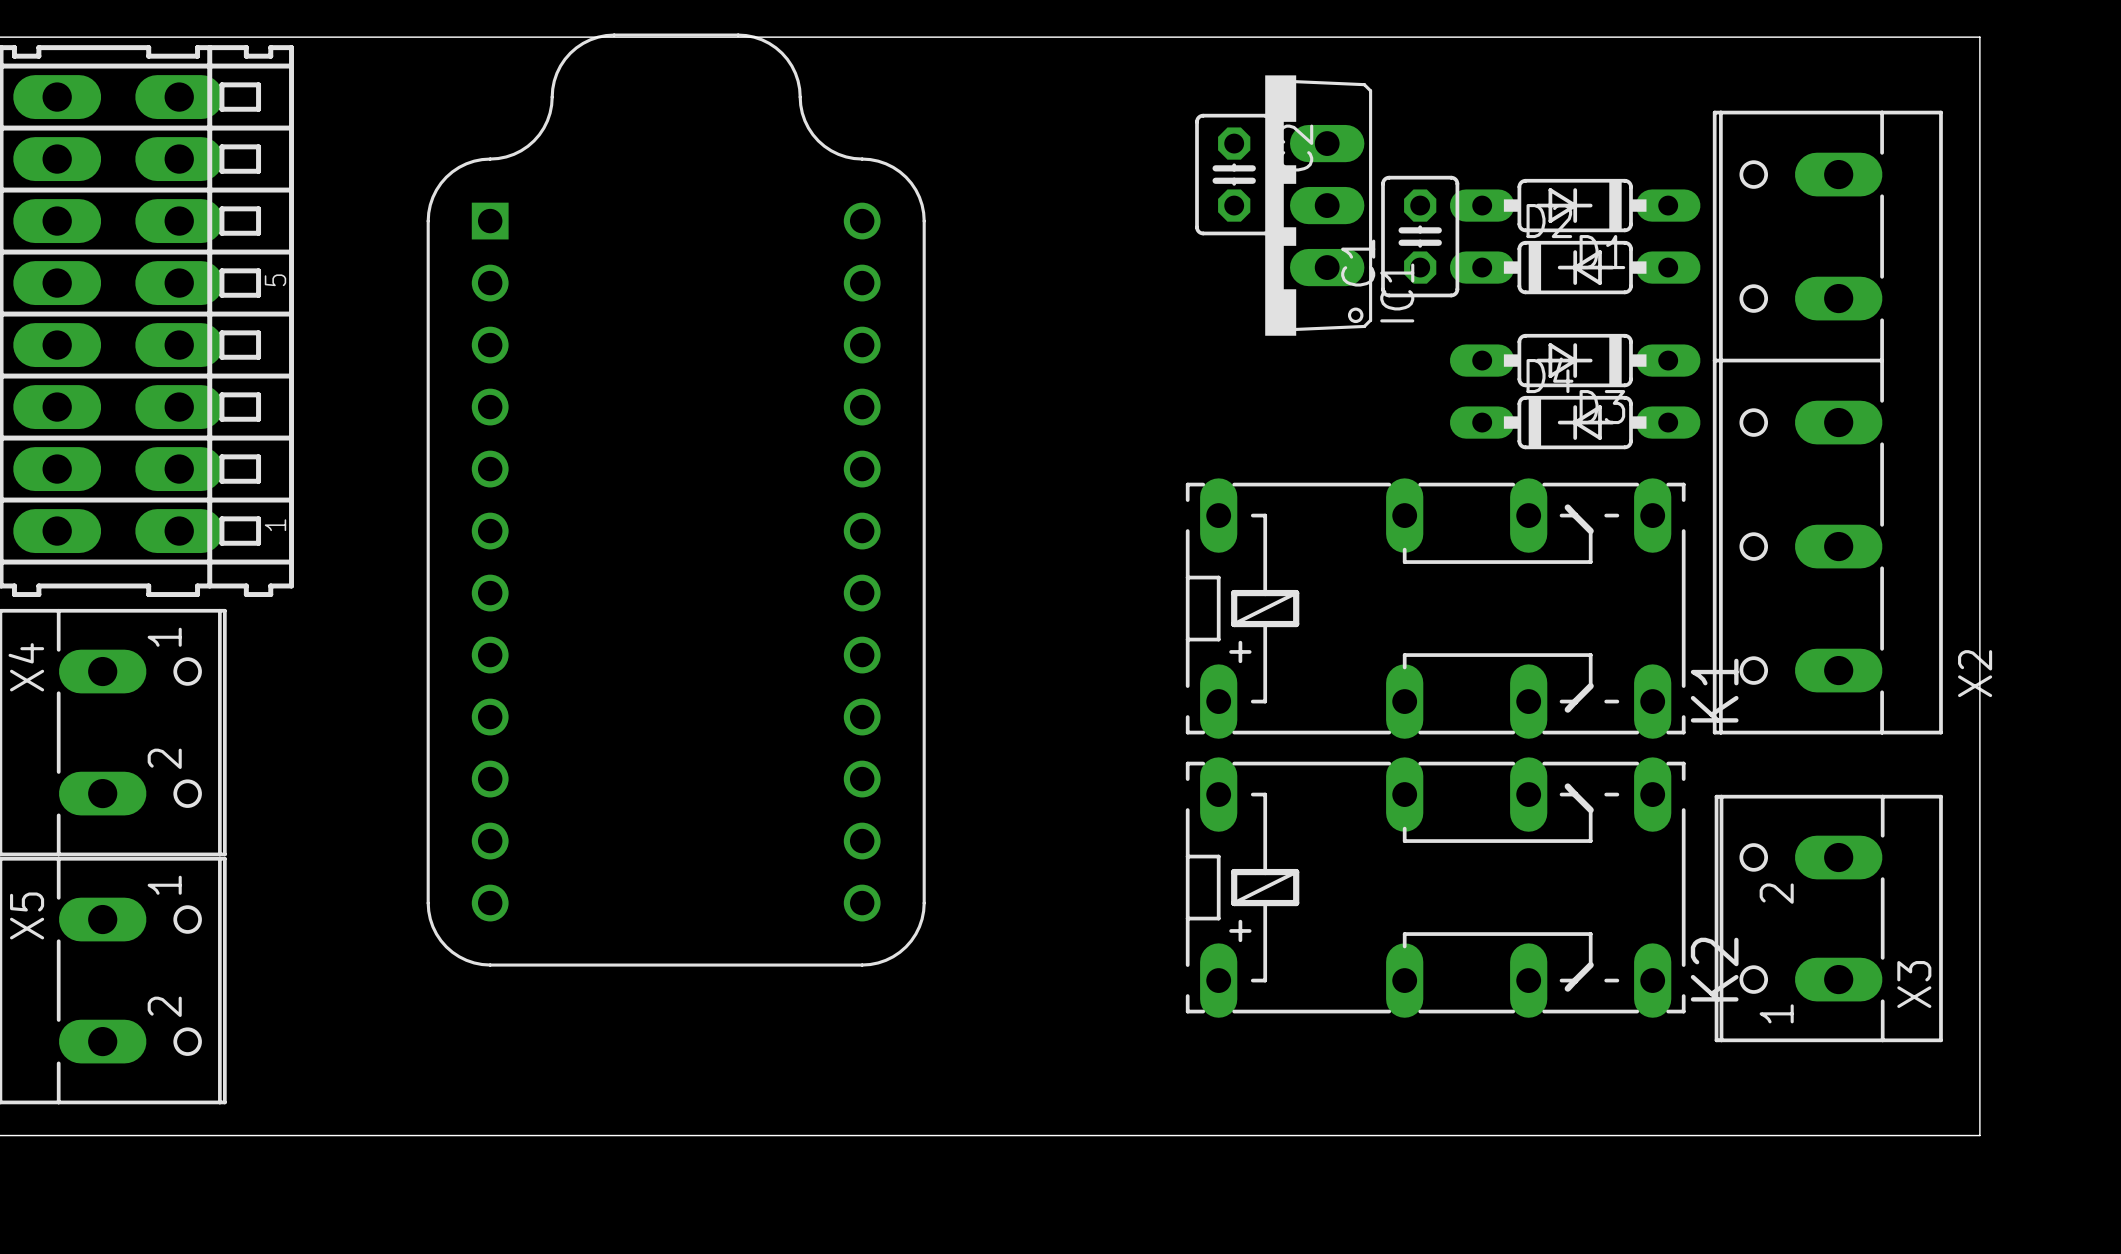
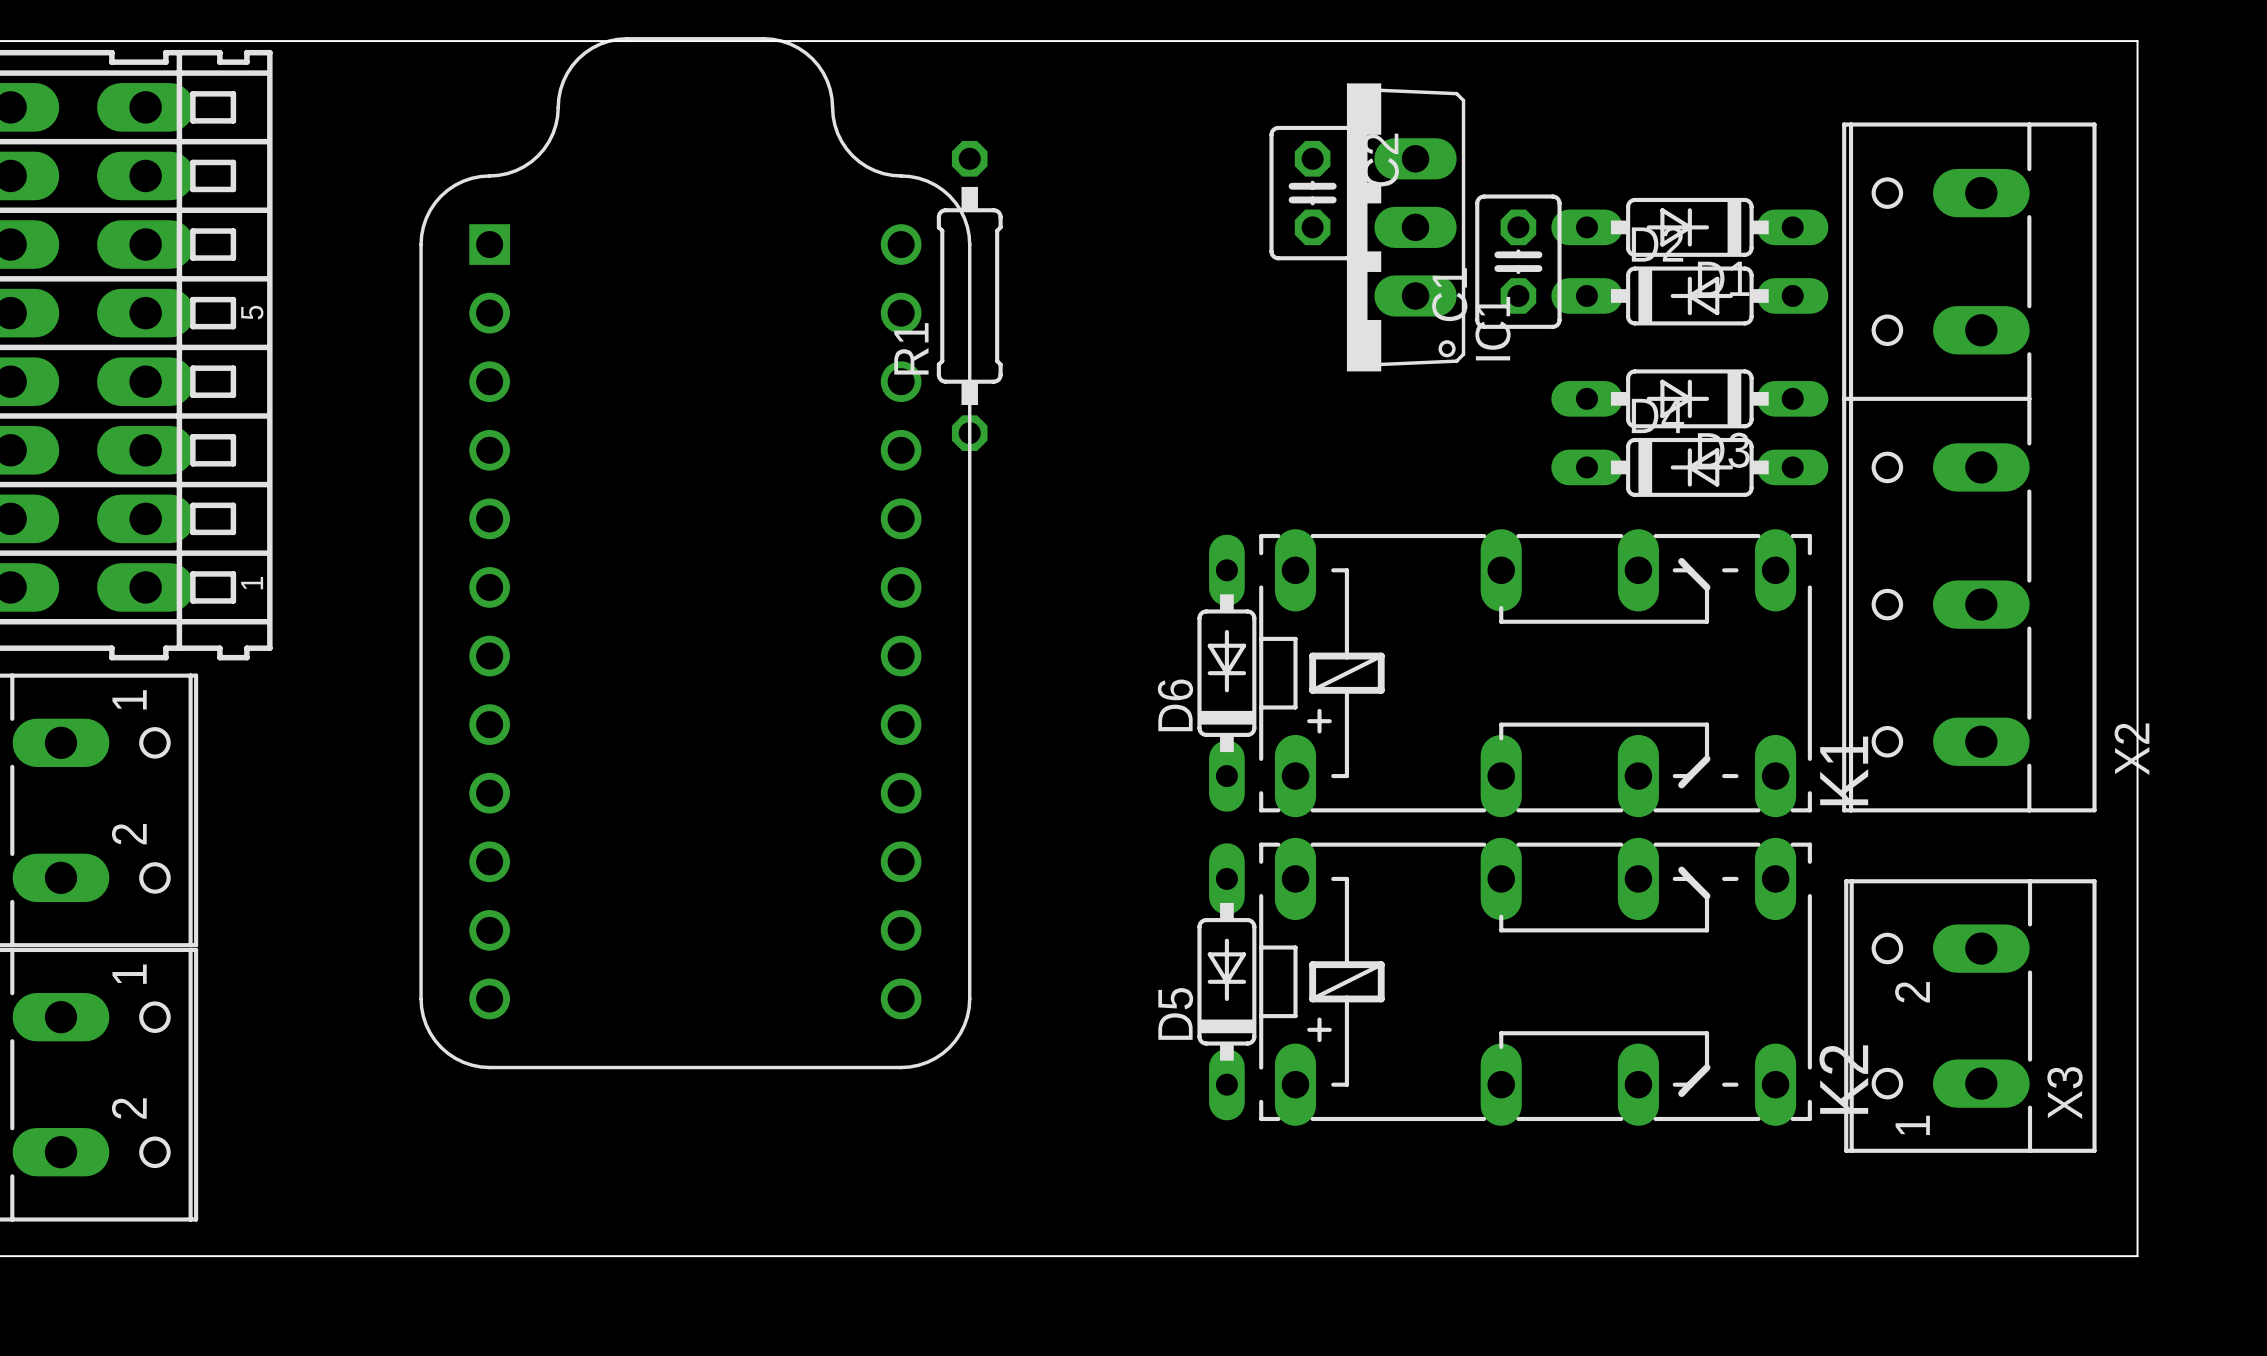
R1: none -> (969, 295)
D6: none -> (1226, 673)
D5: none -> (1226, 981)

